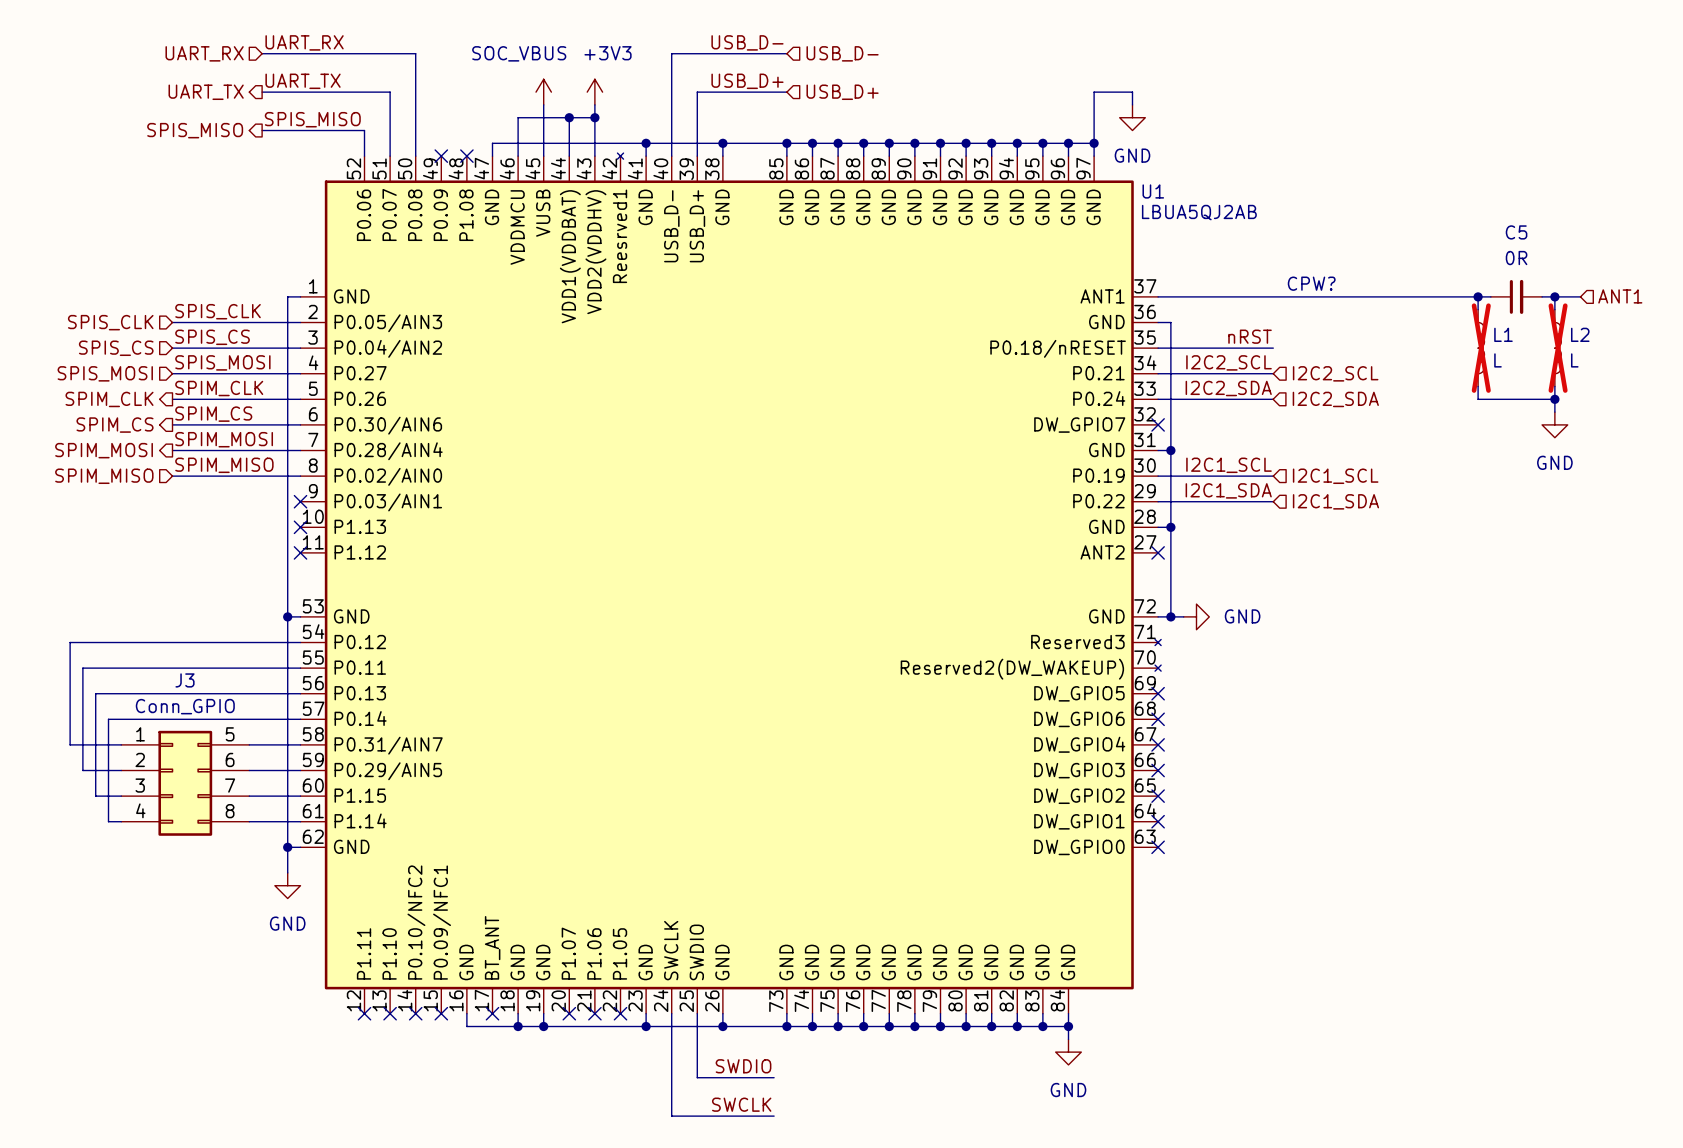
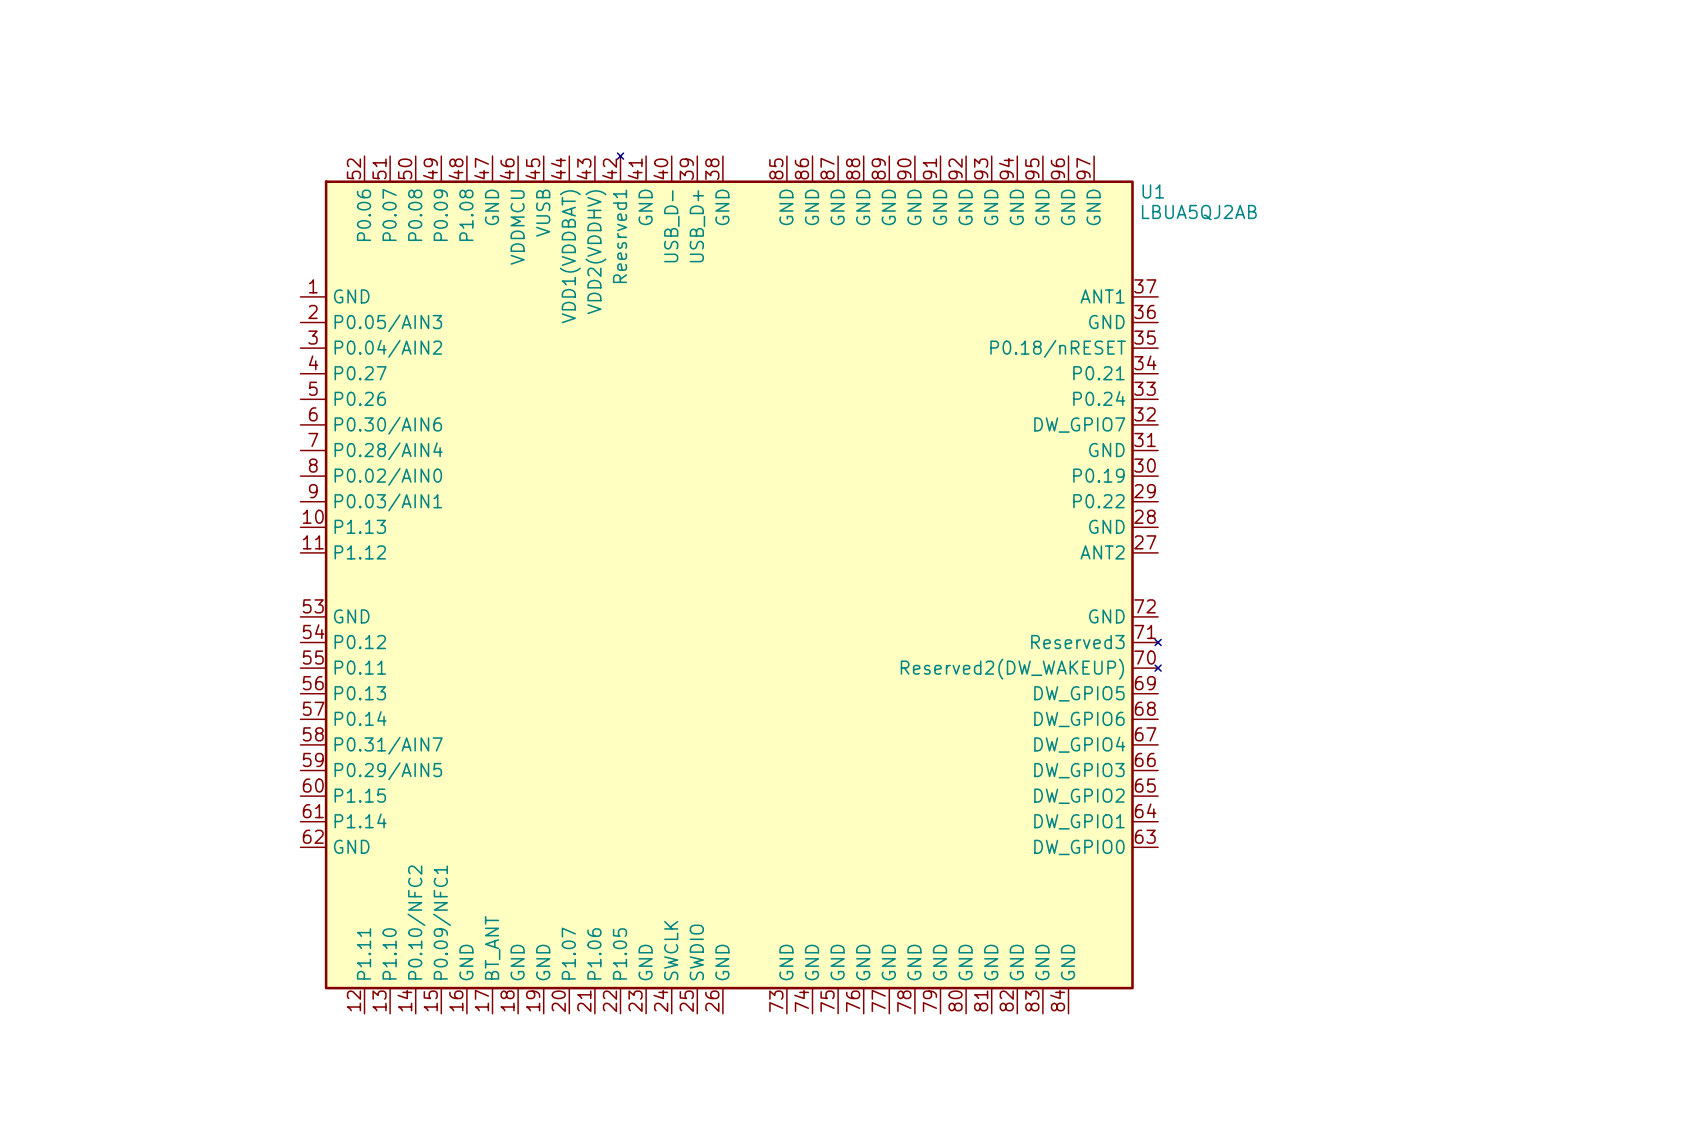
label: UART_RX (304, 42) -> none
label: USB_D- (747, 42) -> none
hierarchical label: UART_RX (204, 53) -> none
wire: (262, 53) (415, 53) (415, 156) -> none
wire: (786, 53) (671, 53) (671, 156) -> none
hierarchical label: USB_D- (842, 53) -> none
label: UART_TX (303, 81) -> none
label: USB_D+ (747, 81) -> none
hierarchical label: UART_TX (206, 92) -> none
wire: (262, 92) (390, 92) (390, 156) -> none
power symbol: SOC_VBUS (543, 92) -> none
power symbol: +3V3 (594, 92) -> none
wire: (786, 92) (697, 92) (697, 156) -> none
hierarchical label: USB_D+ (842, 92) -> none
wire: (543, 104) (543, 156) -> none
wire: (594, 104) (594, 156) -> none
wire: (1132, 104) (1132, 92) (1094, 92) (1094, 156) -> none
wire: (569, 117) (569, 156) -> none
junction: (569, 117) -> none
wire: (594, 117) (518, 117) (518, 156) -> none
junction: (594, 117) -> none
power symbol: GND (1132, 117) -> none
label: SPIS_MISO (312, 119) -> none
hierarchical label: SPIS_MISO (195, 130) -> none
wire: (262, 130) (364, 130) (364, 156) -> none
wire: (646, 143) (646, 156) -> none
junction: (646, 143) -> none
wire: (722, 143) (722, 156) -> none
junction: (722, 143) -> none
wire: (786, 143) (786, 156) -> none
junction: (786, 143) -> none
wire: (812, 143) (812, 156) -> none
junction: (812, 143) -> none
wire: (838, 143) (838, 156) -> none
junction: (838, 143) -> none
wire: (863, 143) (863, 156) -> none
junction: (863, 143) -> none
wire: (889, 143) (889, 156) -> none
junction: (889, 143) -> none
wire: (914, 143) (914, 156) -> none
junction: (914, 143) -> none
wire: (940, 143) (940, 156) -> none
junction: (940, 143) -> none
wire: (966, 143) (966, 156) -> none
junction: (966, 143) -> none
wire: (991, 143) (991, 156) -> none
junction: (991, 143) -> none
wire: (1017, 143) (1017, 156) -> none
junction: (1017, 143) -> none
wire: (1042, 143) (1042, 156) -> none
junction: (1042, 143) -> none
wire: (1068, 143) (1068, 156) -> none
junction: (1068, 143) -> none
wire: (1094, 143) (492, 143) (492, 156) -> none
junction: (1094, 143) -> none
no-connect mark: (441, 156) -> none
no-connect mark: (466, 156) -> none
text: CPW? (1311, 283) -> none
wire: (300, 296) (287, 296) (287, 872) -> none
wire: (1158, 296) (1490, 296) -> none
wire: (1478, 296) (1478, 309) -> none
junction: (1478, 296) -> none
C5: 0R (1516, 296) -> none
wire: (1542, 296) (1580, 296) -> none
wire: (1554, 296) (1554, 309) -> none
junction: (1554, 296) -> none
hierarchical label: ANT1 (1620, 296) -> none
label: SPIS_CLK (218, 311) -> none
hierarchical label: SPIS_CLK (110, 322) -> none
wire: (172, 322) (300, 322) -> none
wire: (1158, 322) (1170, 322) (1170, 616) -> none
label: nRST (1250, 336) -> none
label: SPIS_CS (212, 337) -> none
hierarchical label: SPIS_CS (116, 348) -> none
wire: (172, 348) (300, 348) -> none
wire: (1158, 348) (1273, 348) -> none
L1: L (1481, 348) -> none
L2: L (1558, 348) -> none
label: SPIS_MOSI (222, 362) -> none
label: I2C2_SCL (1229, 362) -> none
hierarchical label: SPIS_MOSI (105, 373) -> none
wire: (172, 373) (300, 373) -> none
wire: (1158, 373) (1273, 373) -> none
hierarchical label: I2C2_SCL (1335, 373) -> none
wire: (1478, 386) (1478, 399) (1554, 399) -> none
wire: (1554, 386) (1554, 412) -> none
label: SPIM_CLK (219, 388) -> none
label: I2C2_SDA (1228, 388) -> none
hierarchical label: SPIM_CLK (109, 399) -> none
wire: (172, 399) (300, 399) -> none
wire: (1158, 399) (1273, 399) -> none
hierarchical label: I2C2_SDA (1335, 399) -> none
junction: (1554, 399) -> none
label: SPIM_CS (213, 414) -> none
wire: (172, 424) (300, 424) -> none
no-connect mark: (1158, 424) -> none
power symbol: GND (1554, 424) -> none
hierarchical label: SPIM_CS (115, 425) -> none
label: SPIM_MOSI (224, 439) -> none
hierarchical label: SPIM_MOSI (104, 450) -> none
wire: (172, 450) (300, 450) -> none
wire: (1158, 450) (1170, 450) -> none
junction: (1170, 450) -> none
label: SPIM_MISO (224, 465) -> none
label: I2C1_SCL (1229, 465) -> none
hierarchical label: SPIM_MISO (104, 476) -> none
wire: (172, 476) (300, 476) -> none
wire: (1158, 476) (1273, 476) -> none
hierarchical label: I2C1_SCL (1335, 476) -> none
label: I2C1_SDA (1228, 490) -> none
no-connect mark: (300, 501) -> none
wire: (1158, 501) (1273, 501) -> none
hierarchical label: I2C1_SDA (1335, 501) -> none
no-connect mark: (300, 527) -> none
wire: (1158, 527) (1170, 527) -> none
junction: (1170, 527) -> none
no-connect mark: (300, 552) -> none
no-connect mark: (1158, 552) -> none
wire: (287, 616) (300, 616) -> none
junction: (287, 616) -> none
wire: (1158, 616) (1183, 616) -> none
junction: (1170, 616) -> none
power symbol: GND (1196, 616) -> none
wire: (300, 642) (70, 642) (70, 744) (121, 744) -> none
wire: (300, 668) (82, 668) (82, 770) (121, 770) -> none
wire: (300, 693) (95, 693) (95, 796) (121, 796) -> none
no-connect mark: (1158, 693) -> none
wire: (300, 719) (108, 719) (108, 821) (121, 821) -> none
no-connect mark: (1158, 719) -> none
wire: (249, 744) (300, 744) -> none
no-connect mark: (1158, 744) -> none
wire: (249, 770) (300, 770) -> none
no-connect mark: (1158, 770) -> none
J3: Conn_GPIO (185, 783) -> none
wire: (249, 796) (300, 796) -> none
no-connect mark: (1158, 796) -> none
wire: (249, 821) (300, 821) -> none
no-connect mark: (1158, 821) -> none
wire: (287, 847) (300, 847) -> none
junction: (287, 847) -> none
no-connect mark: (1158, 847) -> none
power symbol: GND (287, 885) -> none
no-connect mark: (364, 1013) -> none
no-connect mark: (390, 1013) -> none
no-connect mark: (415, 1013) -> none
no-connect mark: (441, 1013) -> none
wire: (466, 1013) (466, 1026) (1068, 1026) -> none
no-connect mark: (492, 1013) -> none
wire: (518, 1013) (518, 1026) -> none
wire: (543, 1013) (543, 1026) -> none
no-connect mark: (569, 1013) -> none
no-connect mark: (594, 1013) -> none
no-connect mark: (620, 1013) -> none
wire: (646, 1013) (646, 1026) -> none
wire: (671, 1013) (671, 1116) (774, 1116) -> none
wire: (697, 1013) (697, 1077) (774, 1077) -> none
wire: (722, 1013) (722, 1026) -> none
wire: (786, 1013) (786, 1026) -> none
wire: (812, 1013) (812, 1026) -> none
wire: (838, 1013) (838, 1026) -> none
wire: (863, 1013) (863, 1026) -> none
wire: (889, 1013) (889, 1026) -> none
wire: (914, 1013) (914, 1026) -> none
wire: (940, 1013) (940, 1026) -> none
wire: (966, 1013) (966, 1026) -> none
wire: (991, 1013) (991, 1026) -> none
wire: (1017, 1013) (1017, 1026) -> none
wire: (1042, 1013) (1042, 1026) -> none
wire: (1068, 1013) (1068, 1039) -> none
junction: (518, 1026) -> none
junction: (543, 1026) -> none
junction: (646, 1026) -> none
junction: (722, 1026) -> none
junction: (786, 1026) -> none
junction: (812, 1026) -> none
junction: (838, 1026) -> none
junction: (863, 1026) -> none
junction: (889, 1026) -> none
junction: (914, 1026) -> none
junction: (940, 1026) -> none
junction: (966, 1026) -> none
junction: (991, 1026) -> none
junction: (1017, 1026) -> none
junction: (1042, 1026) -> none
junction: (1068, 1026) -> none
power symbol: GND (1068, 1052) -> none
label: SWDIO (743, 1066) -> none
label: SWCLK (741, 1104) -> none

